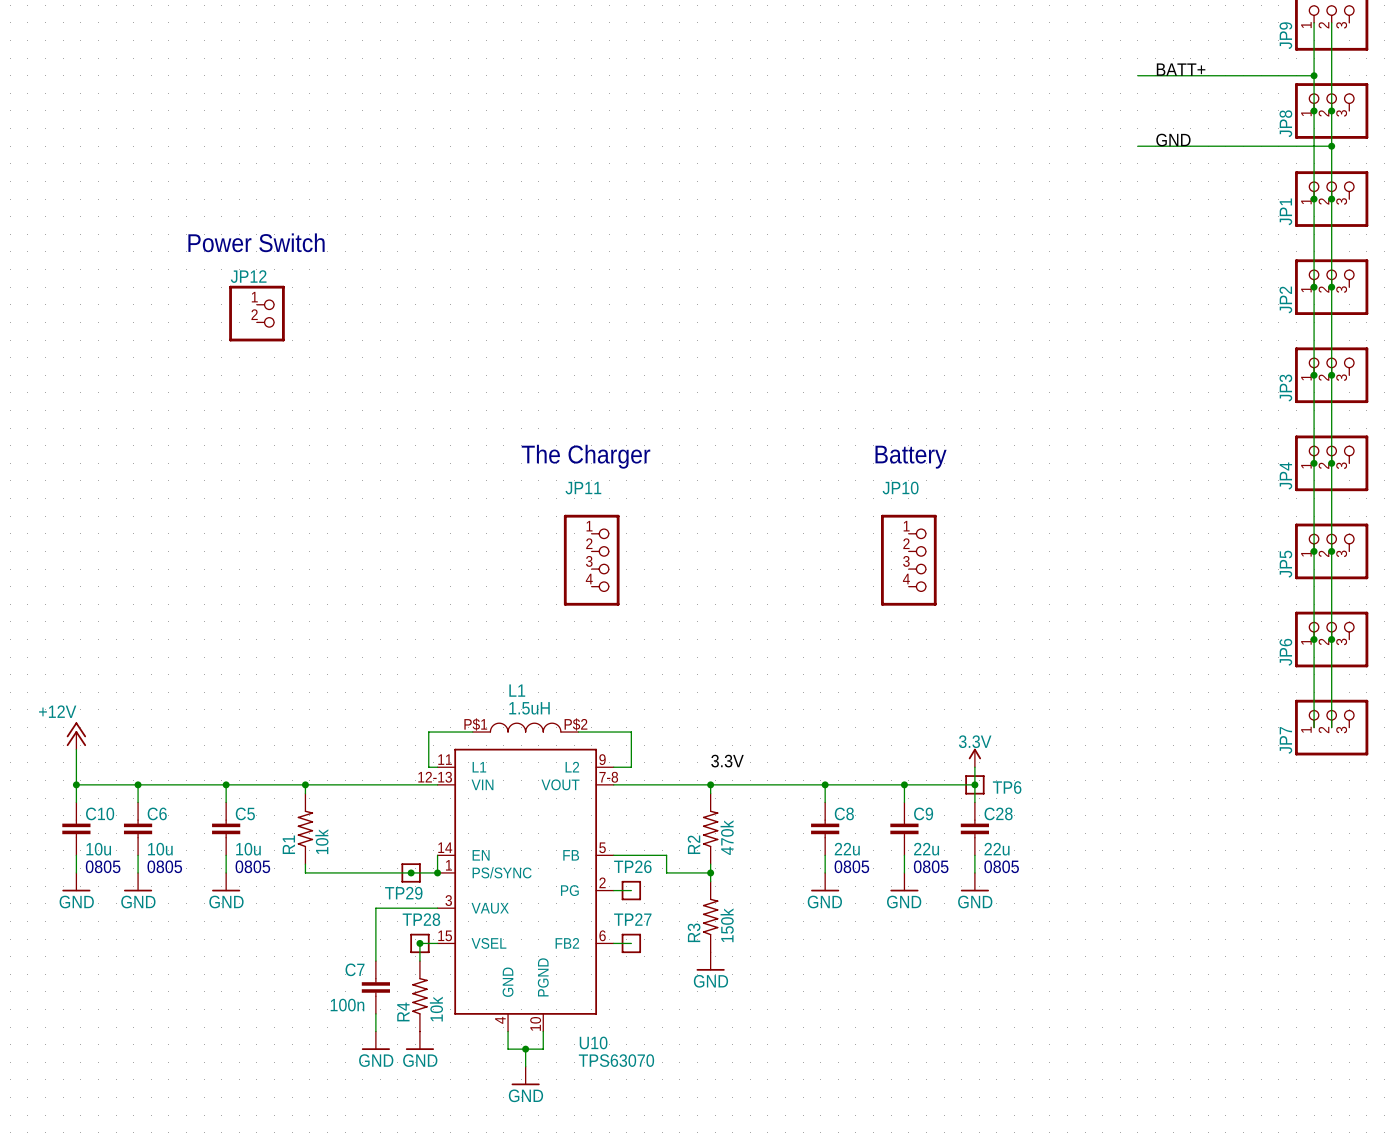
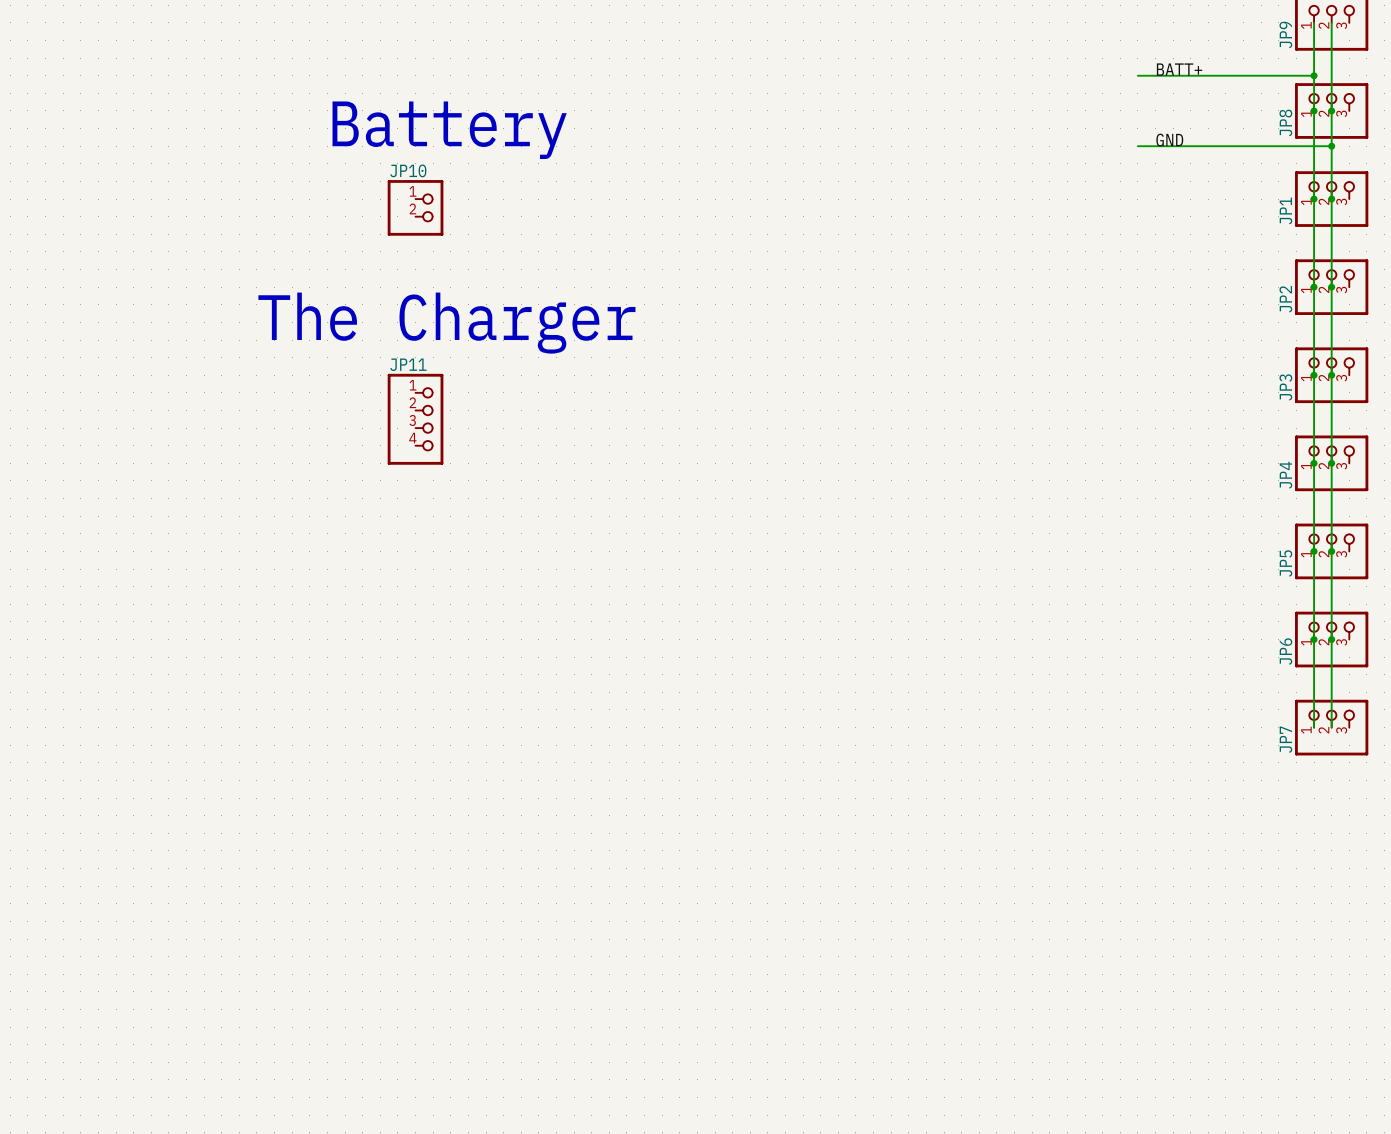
text: none -> Battery (449, 130)
text: Power Switch (256, 242) -> none
JP12: (256, 313) -> none
text: none -> The Charger (446, 323)
text: The Charger (586, 456) -> none
text: Battery (911, 457) -> none
JP11 name position: JP11 (583, 488) -> JP11 (408, 364)
JP10 name position: JP10 (900, 488) -> JP10 (408, 170)
JP10 symbol: [881, 514, 937, 606] -> [387, 180, 444, 236]
JP11 position: (591, 560) -> (415, 419)
L1: 1.5uH (525, 727) -> none
wire: (472, 732) (428, 732) (428, 767) (437, 767) -> none
wire: (578, 732) (631, 732) (631, 767) (613, 767) -> none
power symbol: +12V (76, 735) -> none
wire: (76, 749) (76, 802) -> none
power symbol: 3.3V (974, 758) -> none
label: 3.3V (727, 761) -> none
wire: (974, 767) (974, 802) -> none
wire: (76, 784) (437, 784) -> none
junction: (76, 784) -> none
wire: (138, 784) (138, 802) -> none
junction: (138, 784) -> none
wire: (226, 784) (226, 802) -> none
junction: (226, 784) -> none
wire: (305, 784) (305, 793) -> none
junction: (305, 784) -> none
wire: (613, 784) (974, 784) -> none
wire: (710, 784) (710, 793) -> none
junction: (710, 784) -> none
wire: (825, 784) (825, 802) -> none
junction: (825, 784) -> none
wire: (904, 784) (904, 802) -> none
junction: (904, 784) -> none
TP6: (974, 784) -> none
junction: (974, 784) -> none
C10: 10u (76, 828) -> none
C6: 10u (138, 828) -> none
C5: 10u (226, 828) -> none
R1: 10k (305, 828) -> none
R2: 470k (710, 828) -> none
C8: 22u (825, 828) -> none
C9: 22u (904, 828) -> none
C28: 22u (974, 828) -> none
wire: (76, 855) (76, 872) -> none
wire: (138, 855) (138, 872) -> none
wire: (226, 855) (226, 872) -> none
wire: (437, 855) (437, 872) (305, 872) (305, 864) -> none
wire: (613, 855) (666, 855) (666, 872) (710, 872) -> none
wire: (825, 855) (825, 872) -> none
wire: (904, 855) (904, 872) -> none
wire: (974, 855) (974, 872) -> none
wire: (710, 864) (710, 881) -> none
text: 0805 (103, 866) -> none
text: 0805 (164, 866) -> none
text: 0805 (252, 866) -> none
text: 0805 (851, 866) -> none
text: 0805 (931, 866) -> none
text: 0805 (1001, 866) -> none
TP29: (411, 872) -> none
junction: (411, 872) -> none
junction: (437, 872) -> none
junction: (710, 872) -> none
power symbol: GND (76, 882) -> none
power symbol: GND (138, 882) -> none
power symbol: GND (226, 882) -> none
power symbol: GND (825, 882) -> none
power symbol: GND (904, 882) -> none
power symbol: GND (974, 882) -> none
U10: TPS63070 (525, 890) -> none
wire: (613, 890) (631, 890) -> none
TP26: (631, 890) -> none
wire: (437, 908) (375, 908) (375, 961) -> none
R3: 150k (710, 917) -> none
TP28: (419, 943) -> none
junction: (419, 943) -> none
wire: (437, 943) (419, 943) (419, 961) -> none
wire: (613, 943) (631, 943) -> none
TP27: (631, 943) -> none
power symbol: GND (710, 961) -> none
C7: 100n (375, 987) -> none
R4: 10k (419, 996) -> none
wire: (375, 1013) (375, 1031) -> none
wire: (508, 1031) (508, 1049) (543, 1049) (543, 1031) -> none
power symbol: GND (375, 1040) -> none
power symbol: GND (419, 1040) -> none
wire: (525, 1049) (525, 1066) -> none
junction: (525, 1049) -> none
power symbol: GND (525, 1076) -> none

